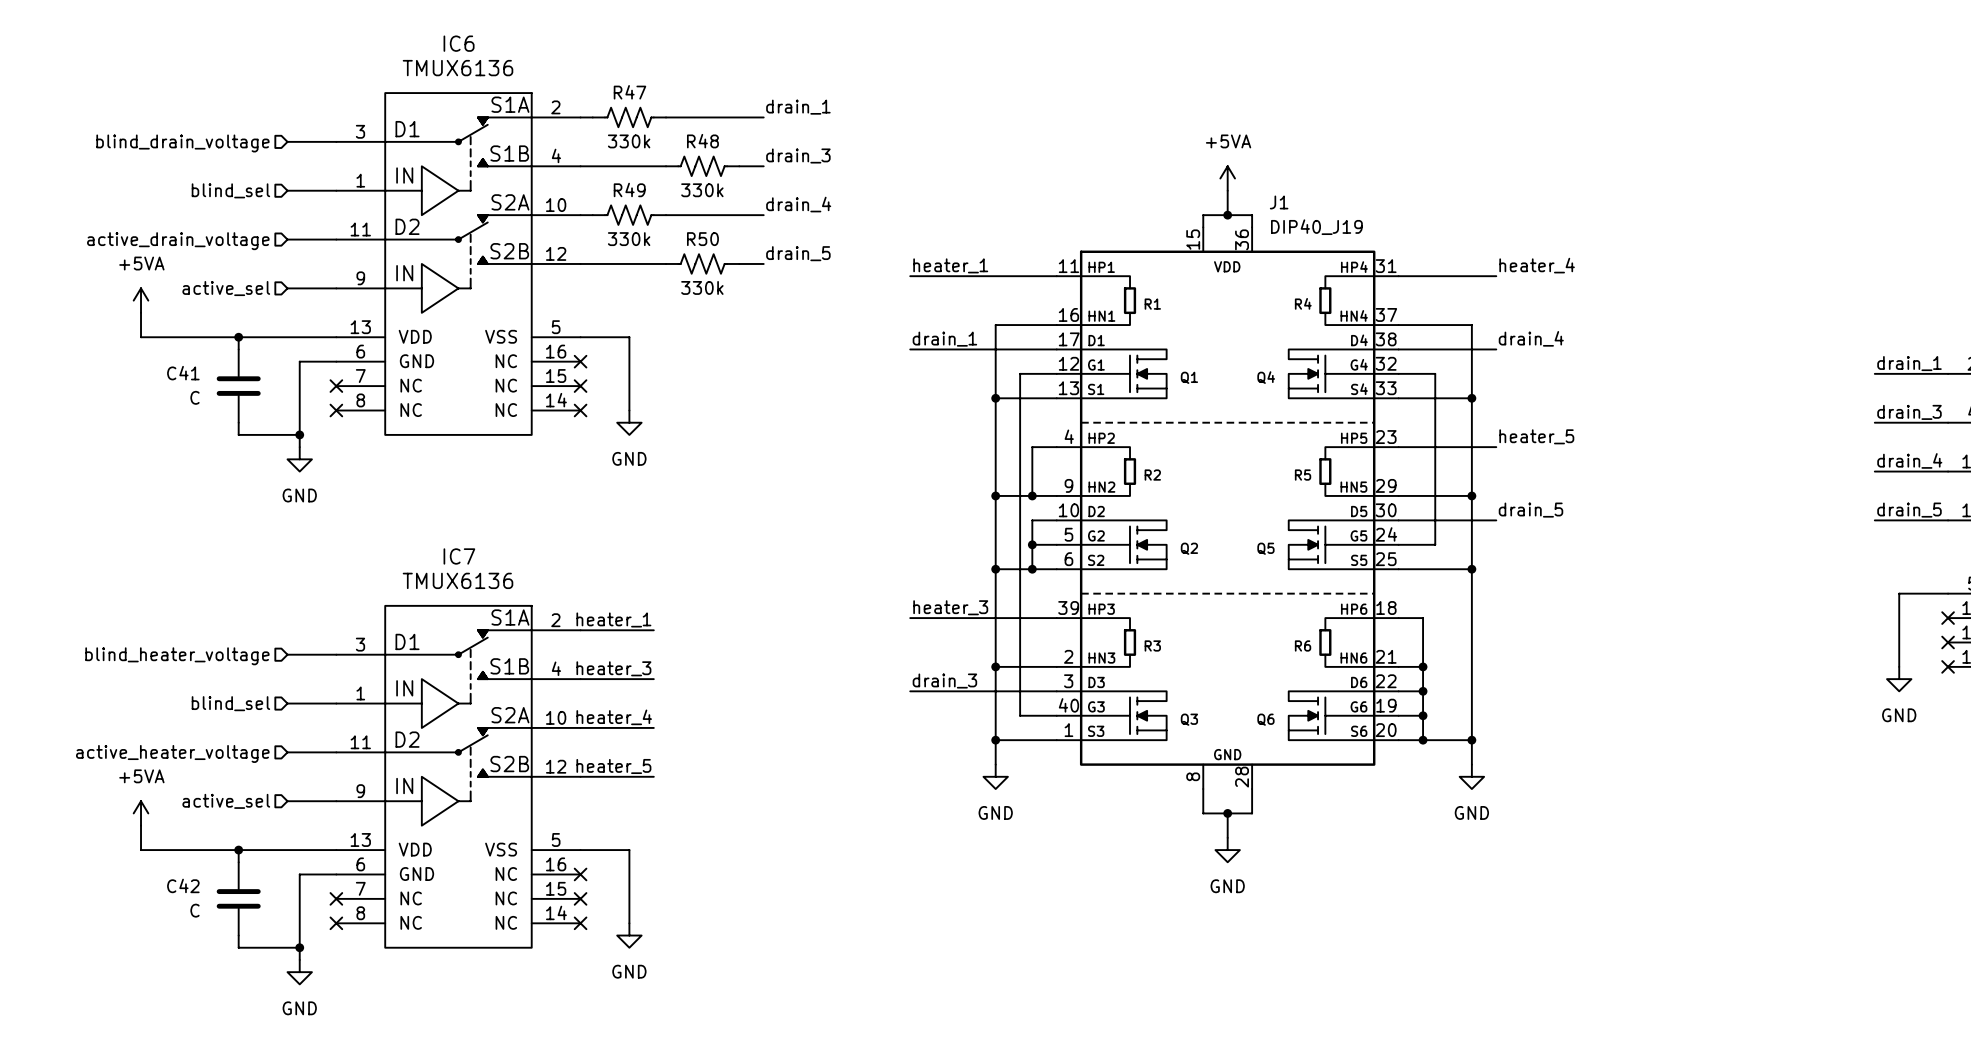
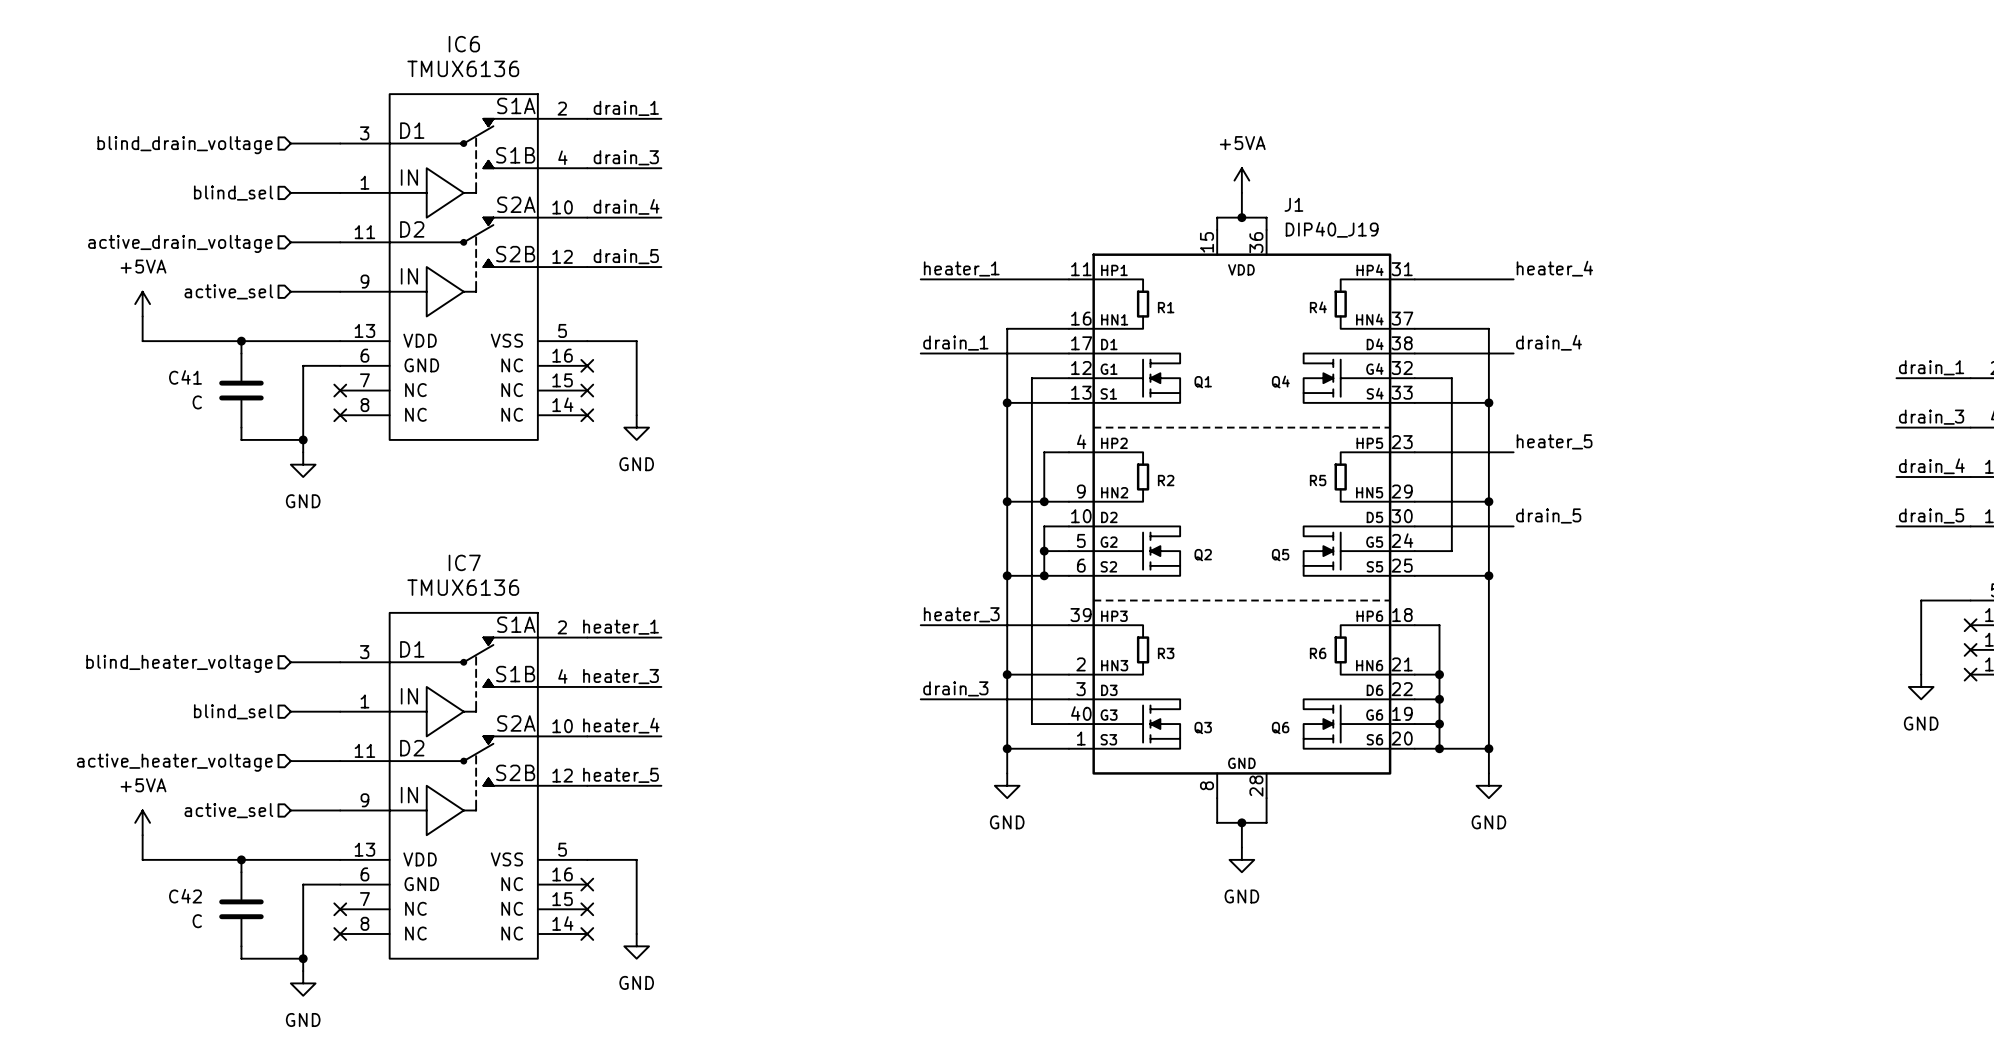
label position: drain_1 (798, 107) -> drain_1 (626, 108)
wire: none -> (599, 118) (661, 118)
R47: 330k (629, 117) -> none
wire: (666, 117) (763, 117) -> none
label position: drain_3 (798, 155) -> drain_3 (626, 157)
wire: (653, 166) (666, 166) -> none
R48: 330k (702, 166) -> none
wire: (739, 166) (763, 166) -> none
label position: drain_4 (798, 204) -> drain_4 (626, 206)
wire: none -> (599, 217) (661, 217)
R49: 330k (629, 215) -> none
wire: (666, 215) (763, 215) -> none
label position: drain_5 (798, 253) -> drain_5 (626, 256)
wire: (653, 263) (666, 263) -> none
R50: 330k (702, 263) -> none
wire: (739, 263) (763, 263) -> none

